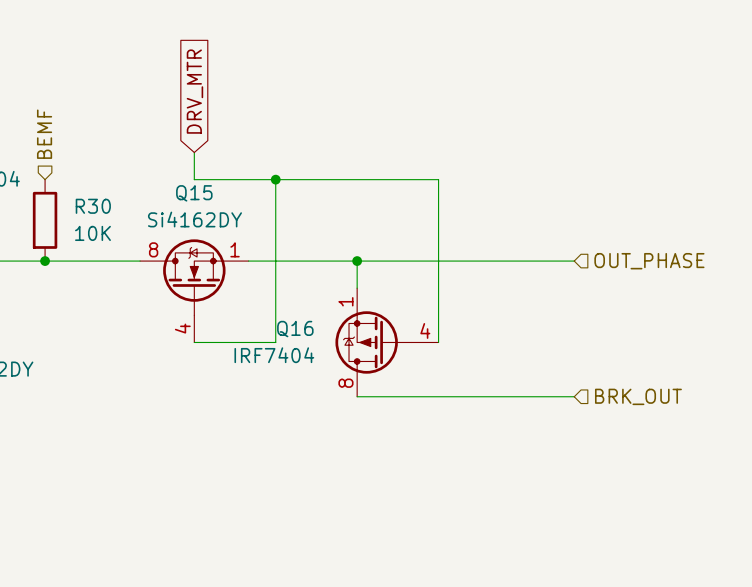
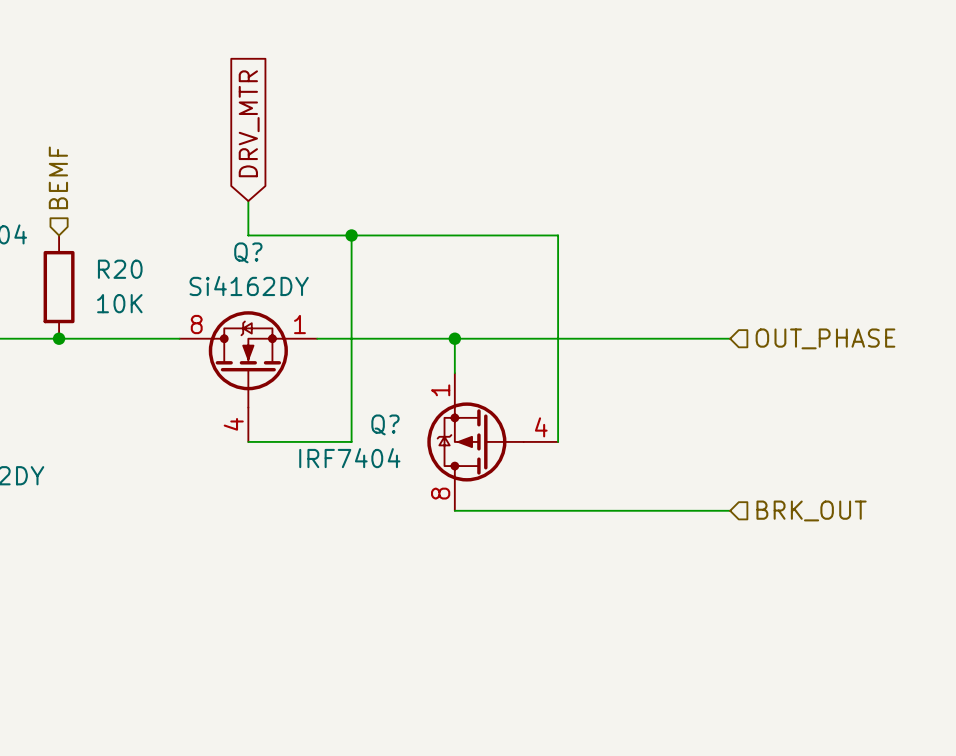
Q15 name: Q15 (194, 193) -> Q? (248, 252)
R30 name: R30 (93, 206) -> R20 (120, 269)
Q16 name: Q16 (295, 329) -> Q? (385, 424)

